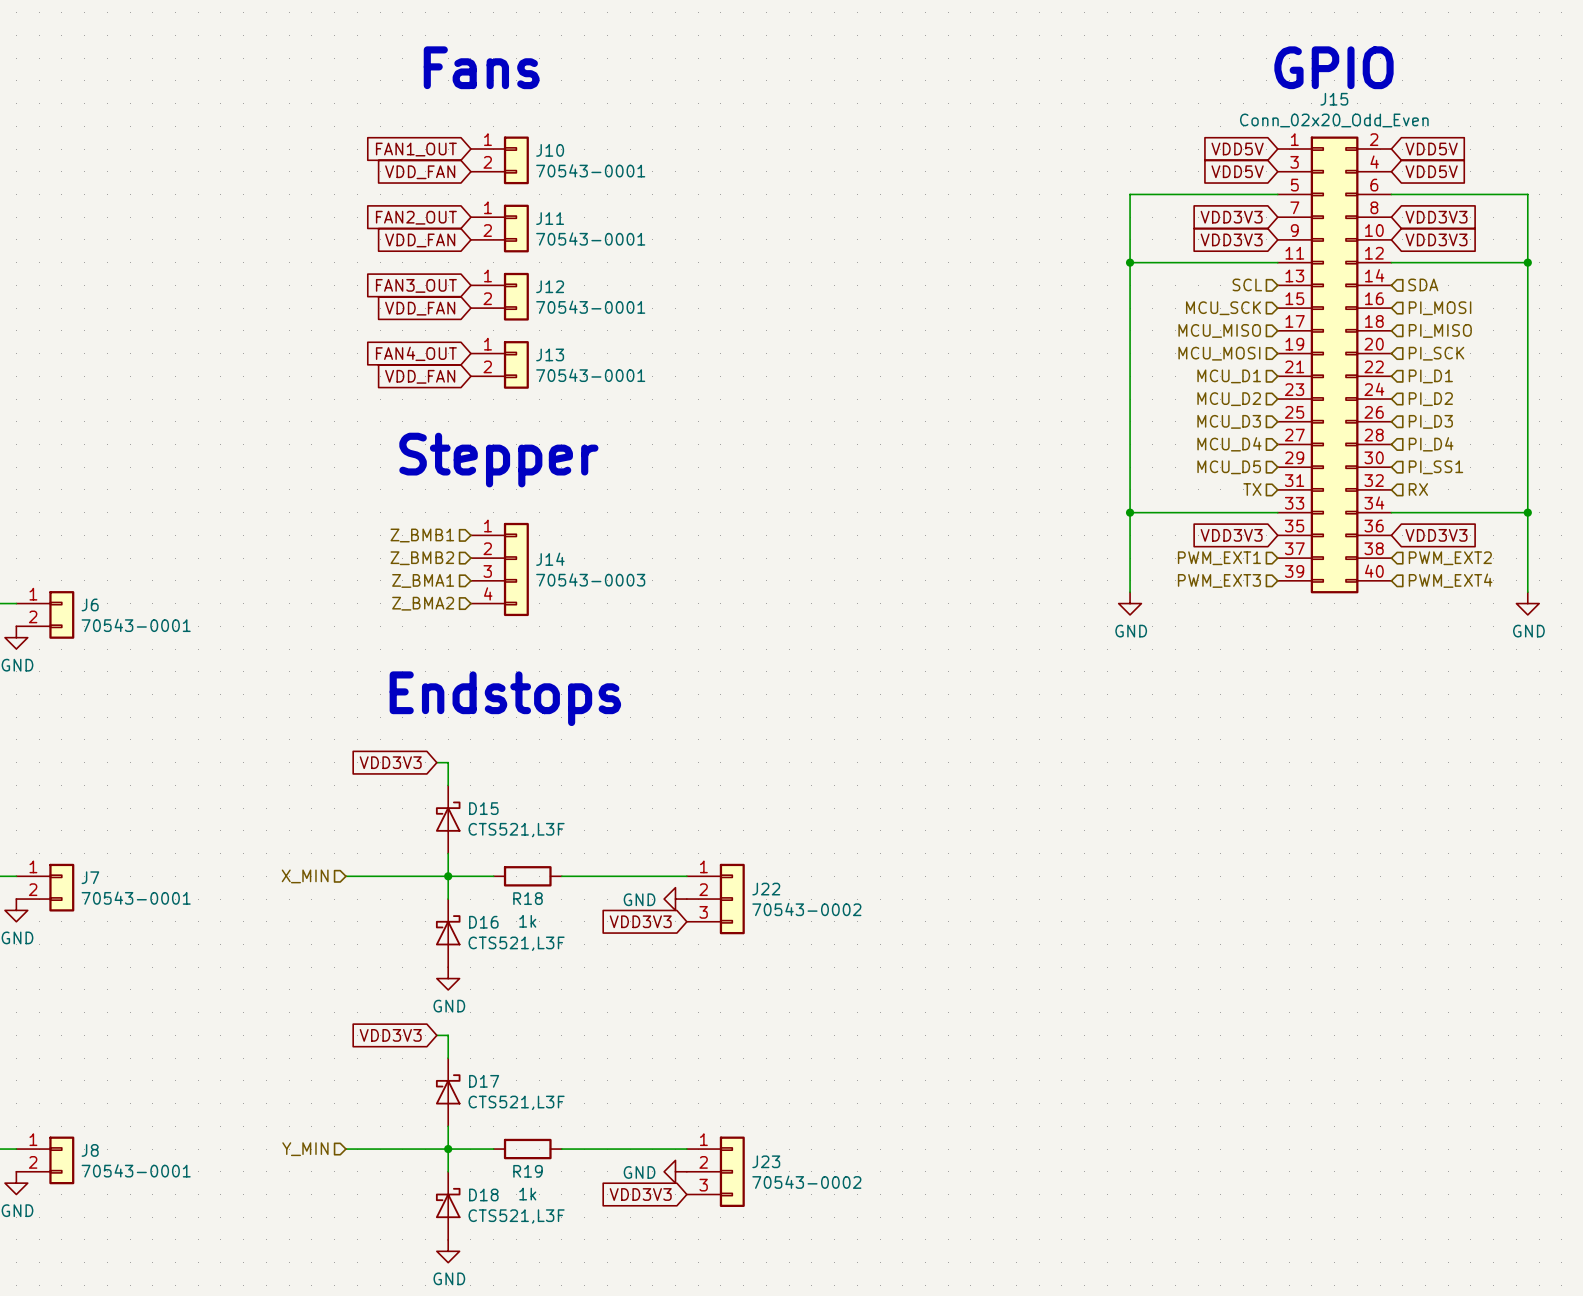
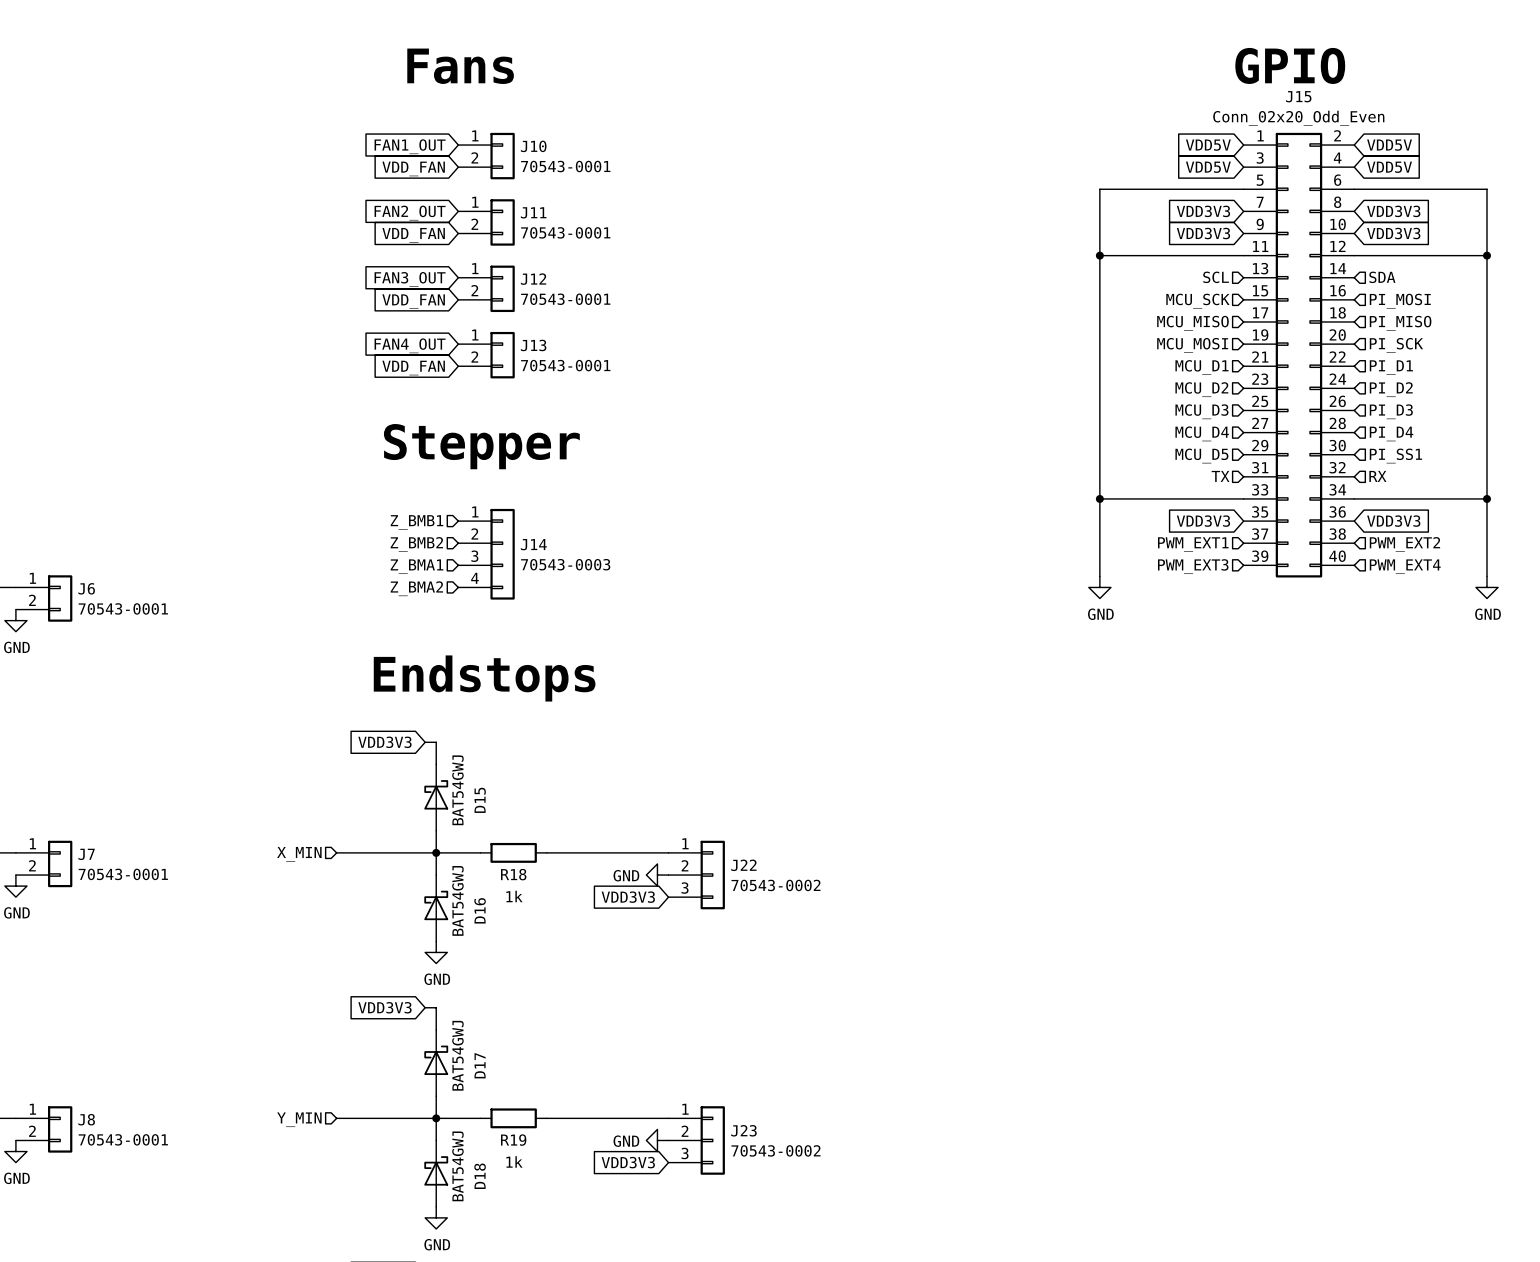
D15 name rotation: 0° (483, 808) -> 90° counterclockwise (480, 800)
D15 value: CTS521,L3F (516, 830) -> BAT54GWJ (457, 790)
D16 name rotation: 0° (483, 922) -> 90° counterclockwise (480, 910)
D16 value: CTS521,L3F (516, 943) -> BAT54GWJ (457, 900)
D17 name rotation: 0° (484, 1081) -> 90° counterclockwise (480, 1065)
D17 value: CTS521,L3F (516, 1102) -> BAT54GWJ (457, 1055)
D18 name rotation: 0° (483, 1194) -> 90° counterclockwise (480, 1176)
D18 value: CTS521,L3F (516, 1216) -> BAT54GWJ (457, 1166)

